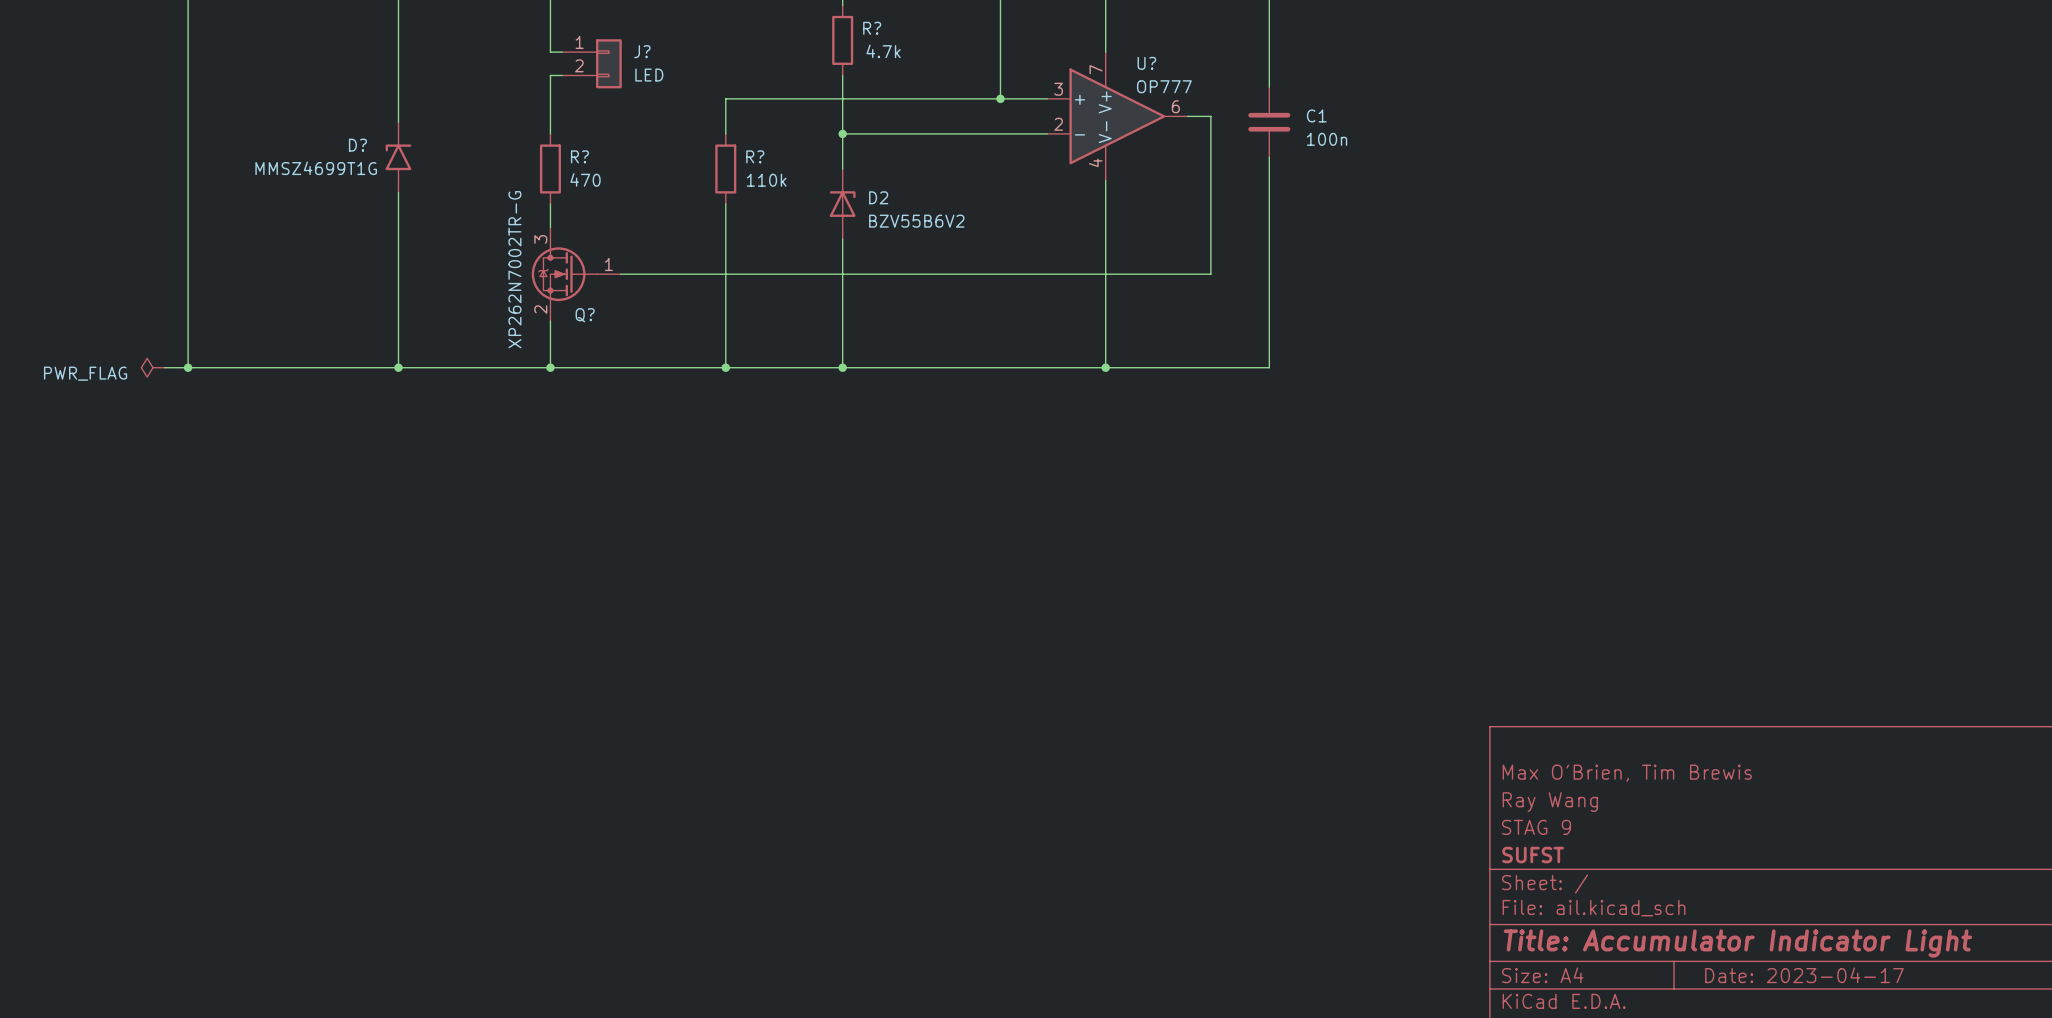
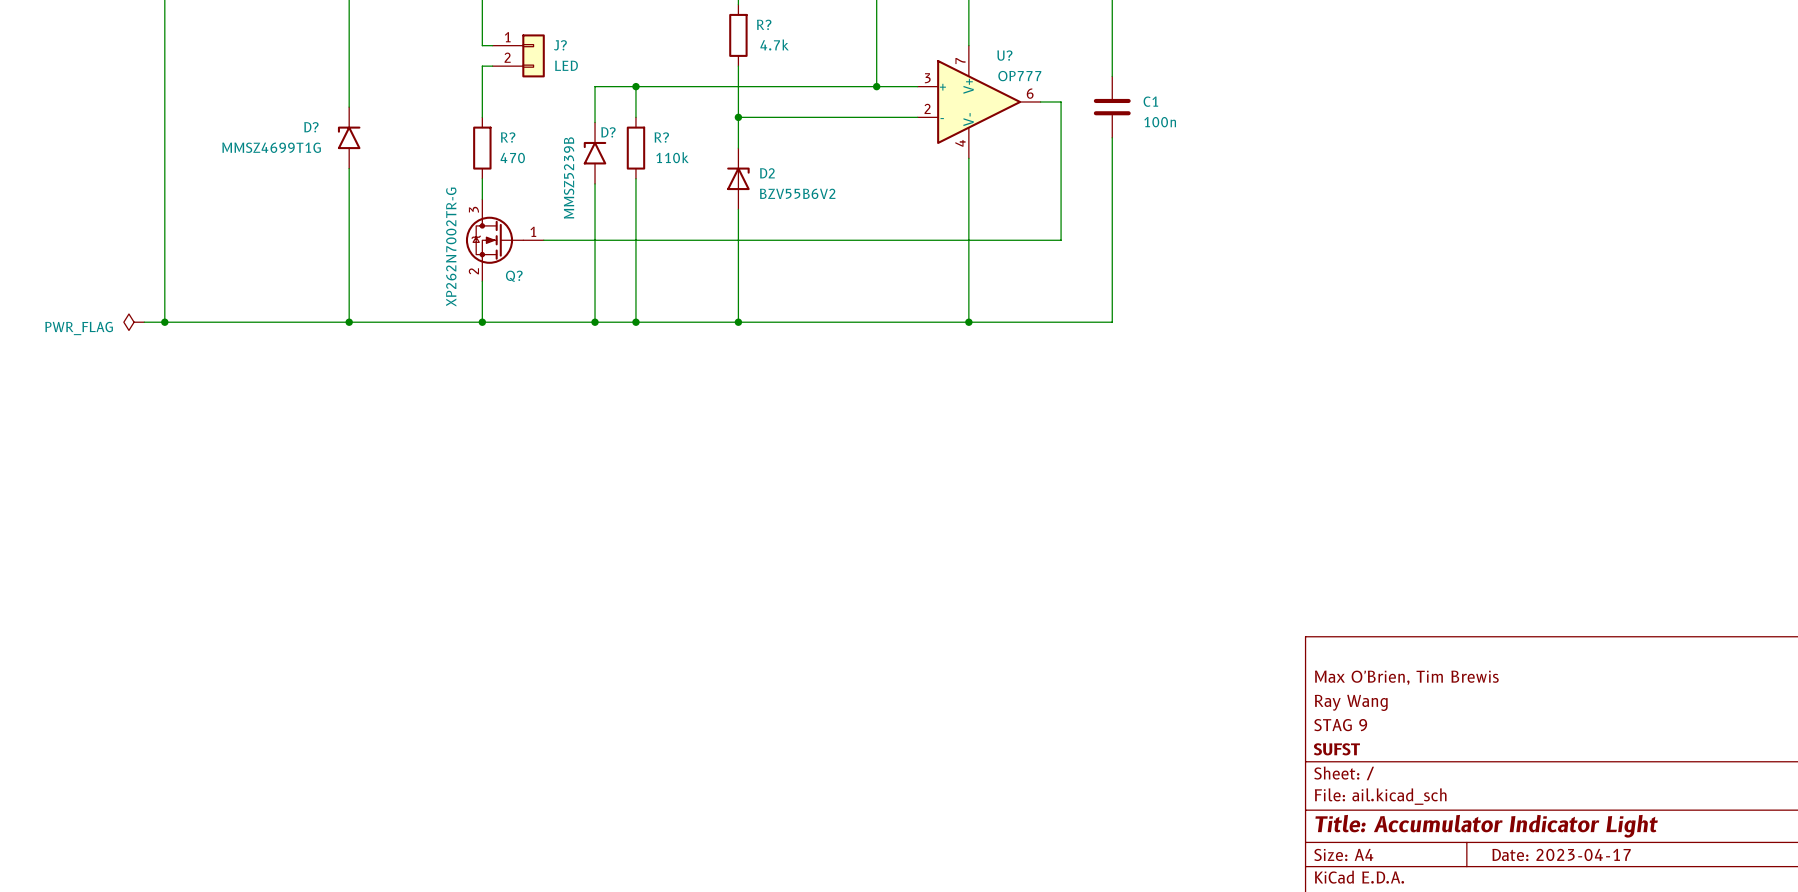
wire: none -> (635, 86) (595, 86) (595, 122)
junction: none -> (635, 86)
D?: none -> MMSZ5239B (595, 153)
wire: none -> (595, 183) (595, 322)
junction: none -> (595, 322)

